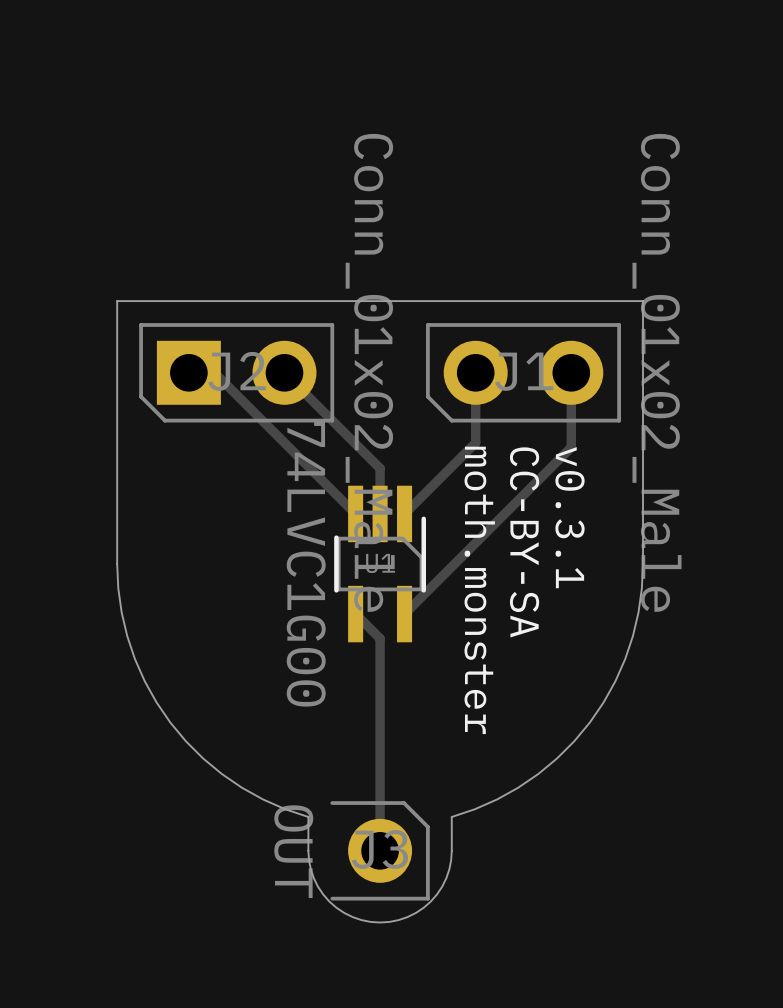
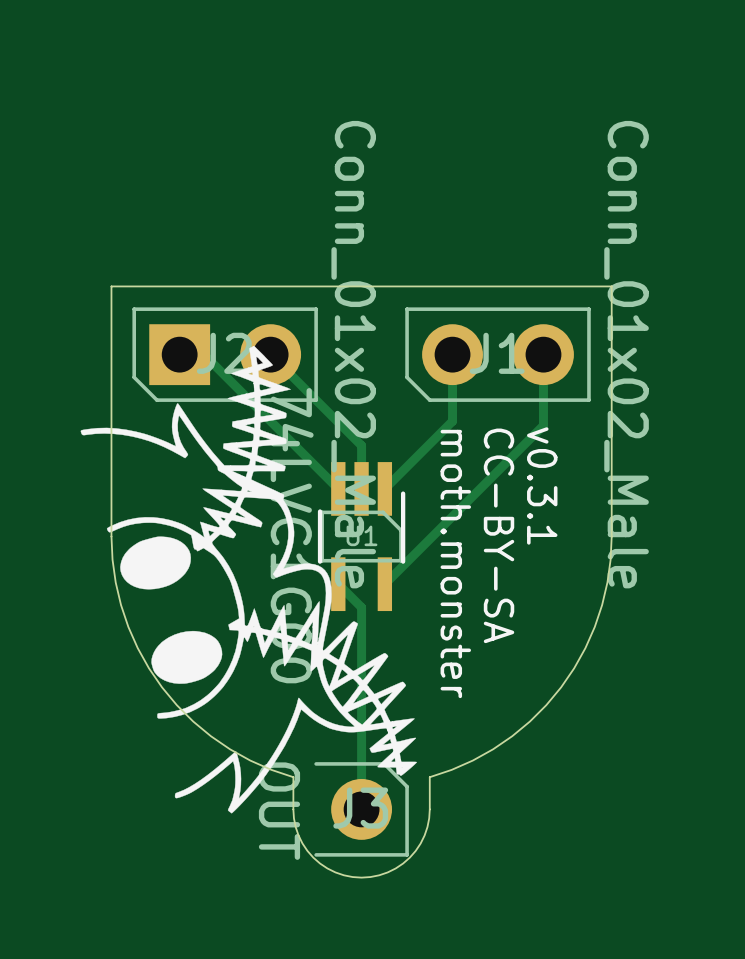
drawing: none -> [80, 345, 417, 814]

